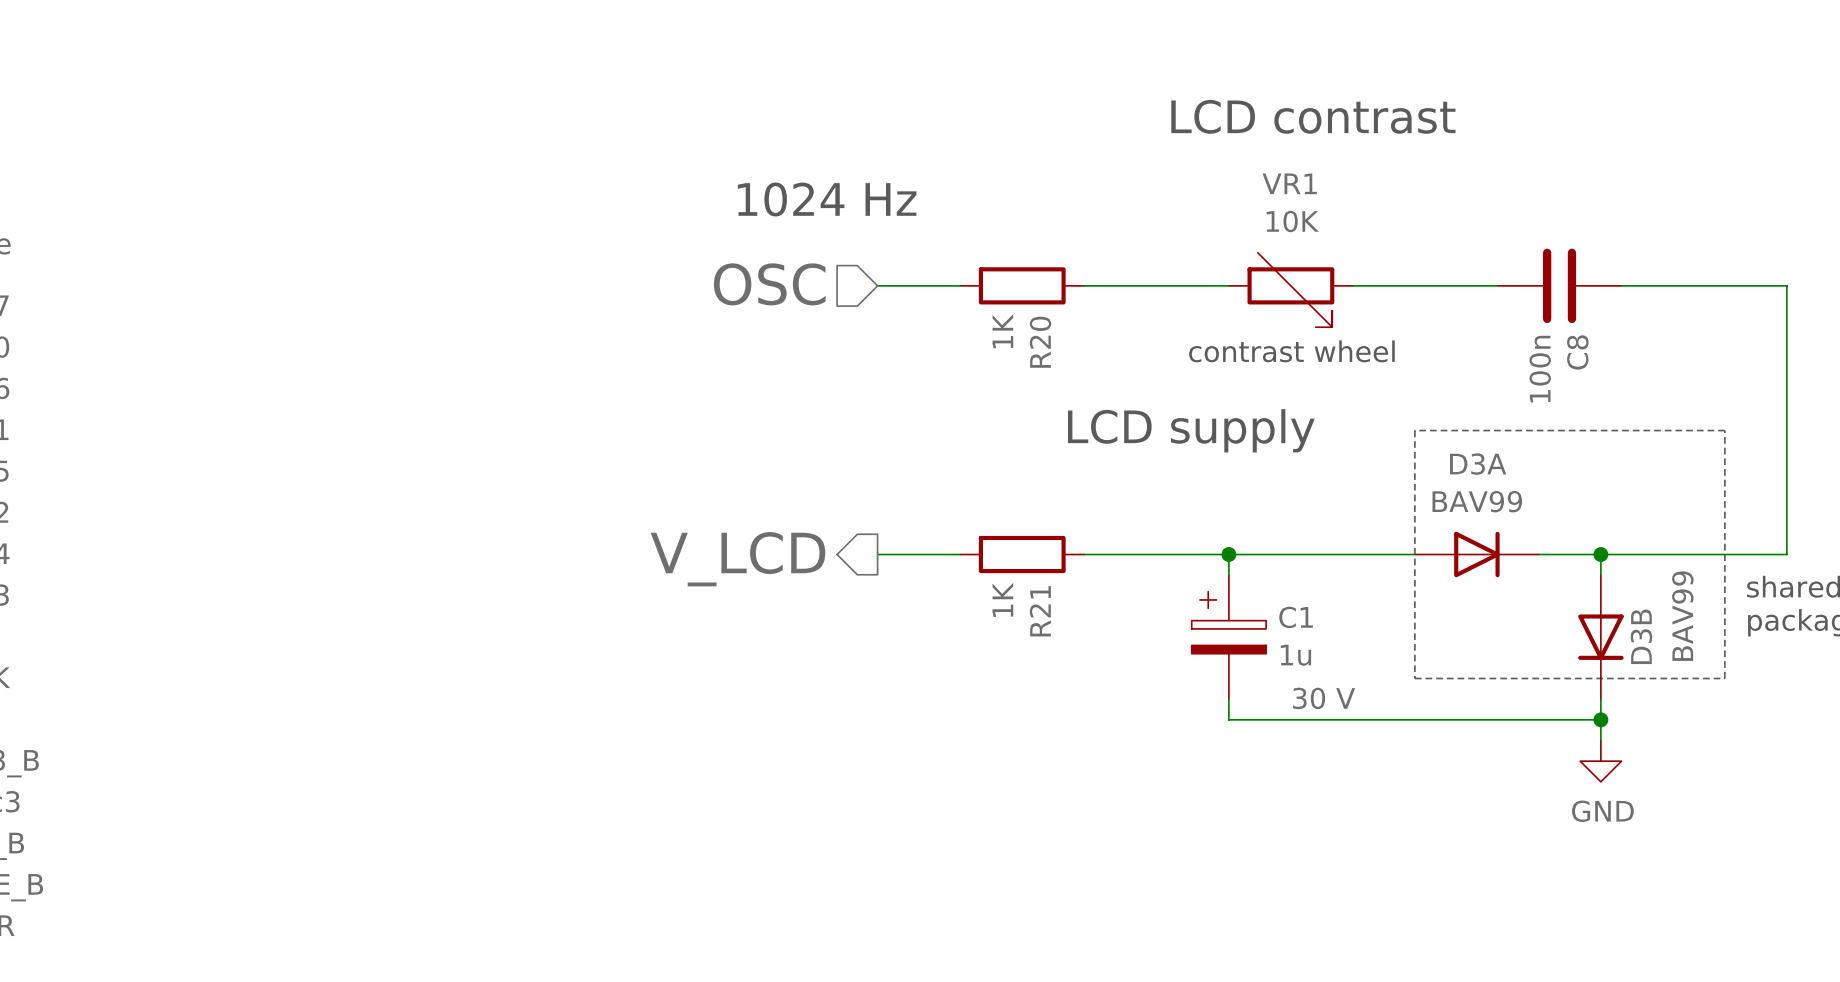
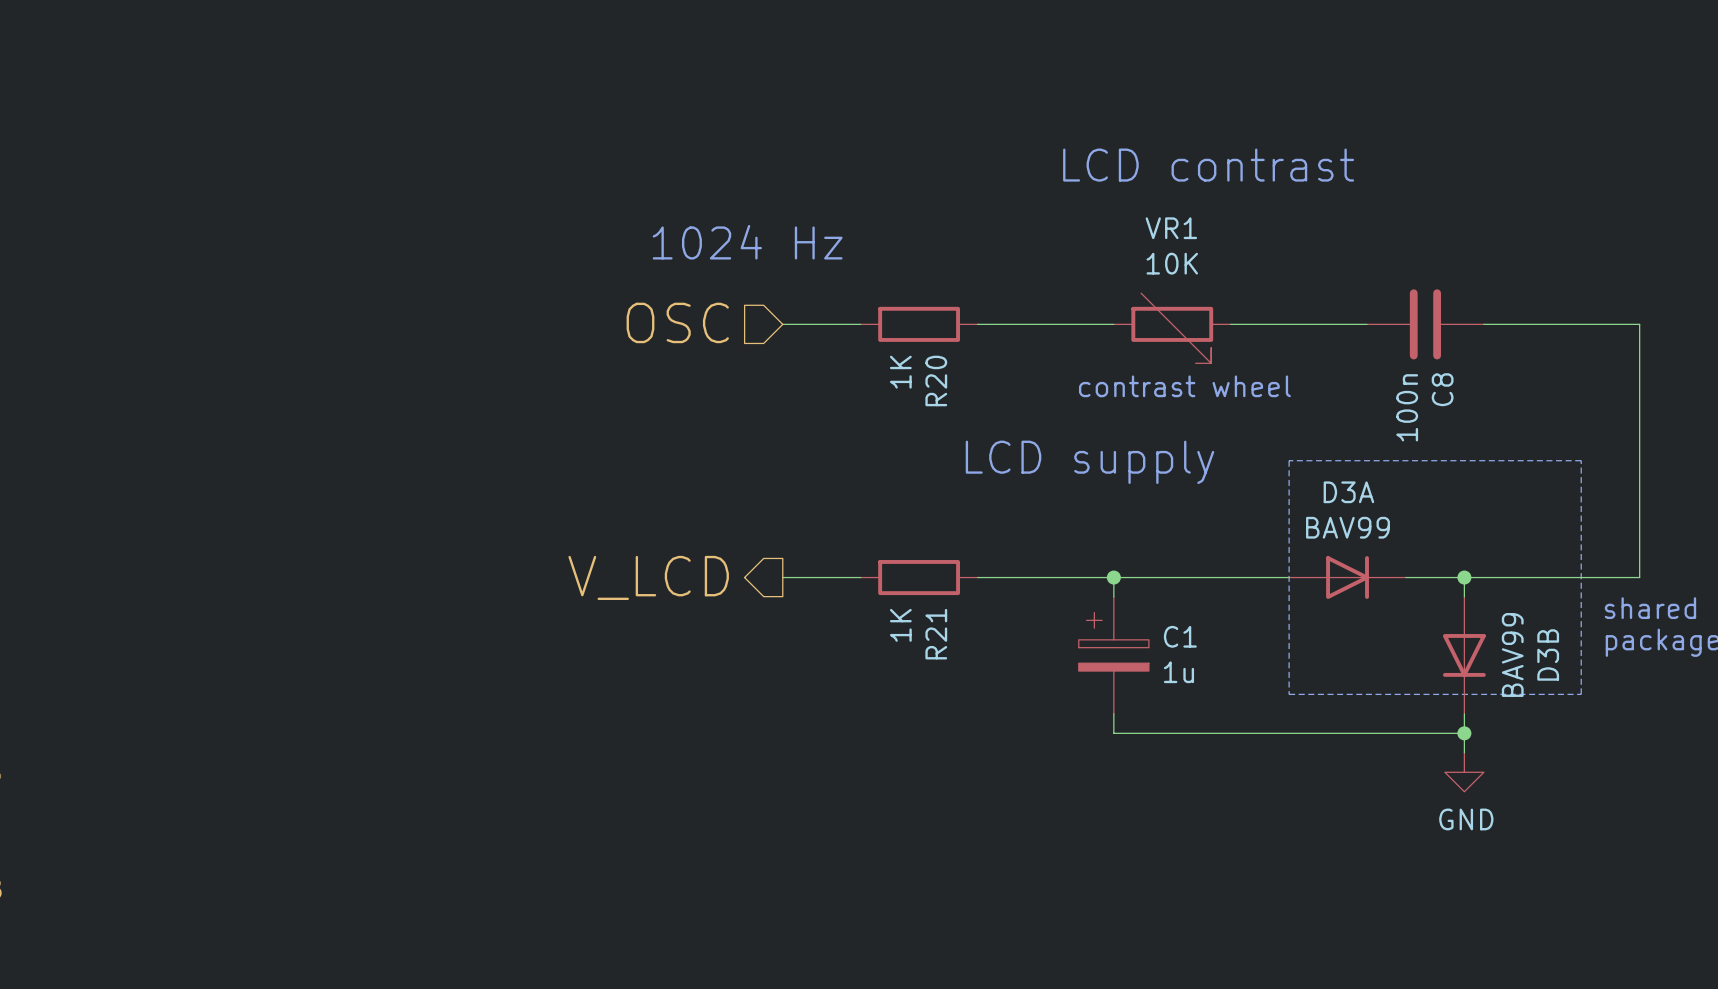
D3B value position: BAV99 (1682, 616) -> BAV99 (1512, 654)
D3B name position: D3B (1641, 636) -> D3B (1548, 654)
C1 text: 30 V (1324, 698) -> none

